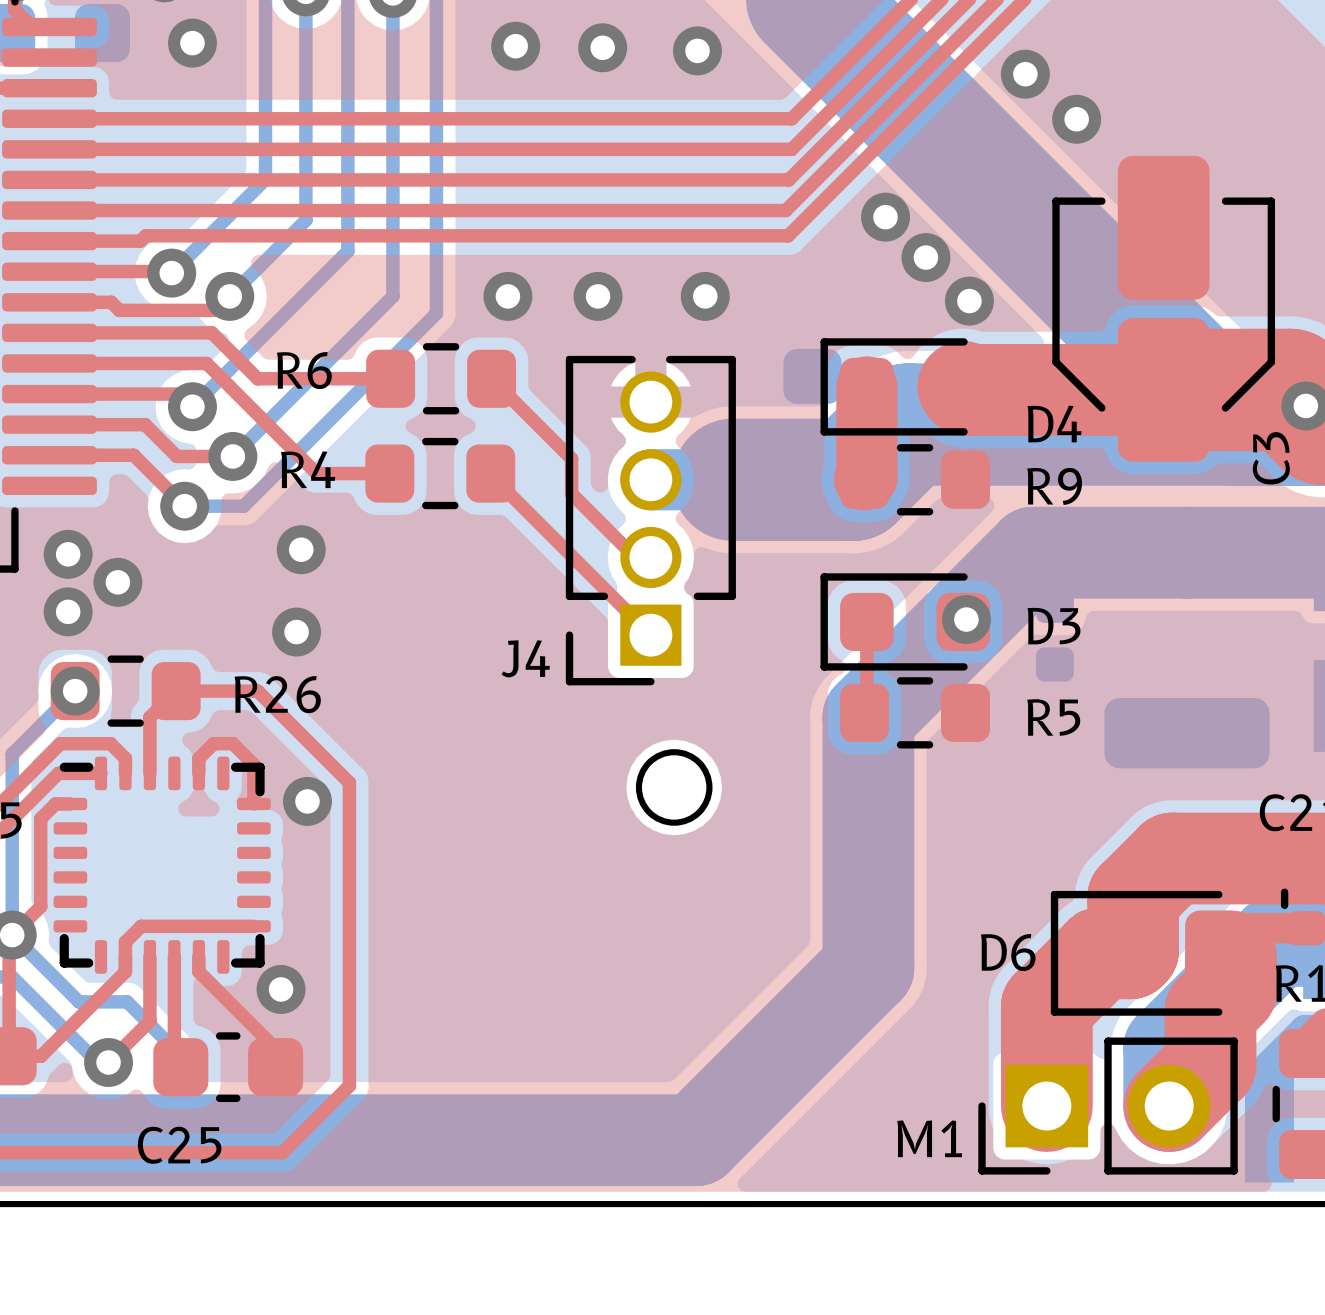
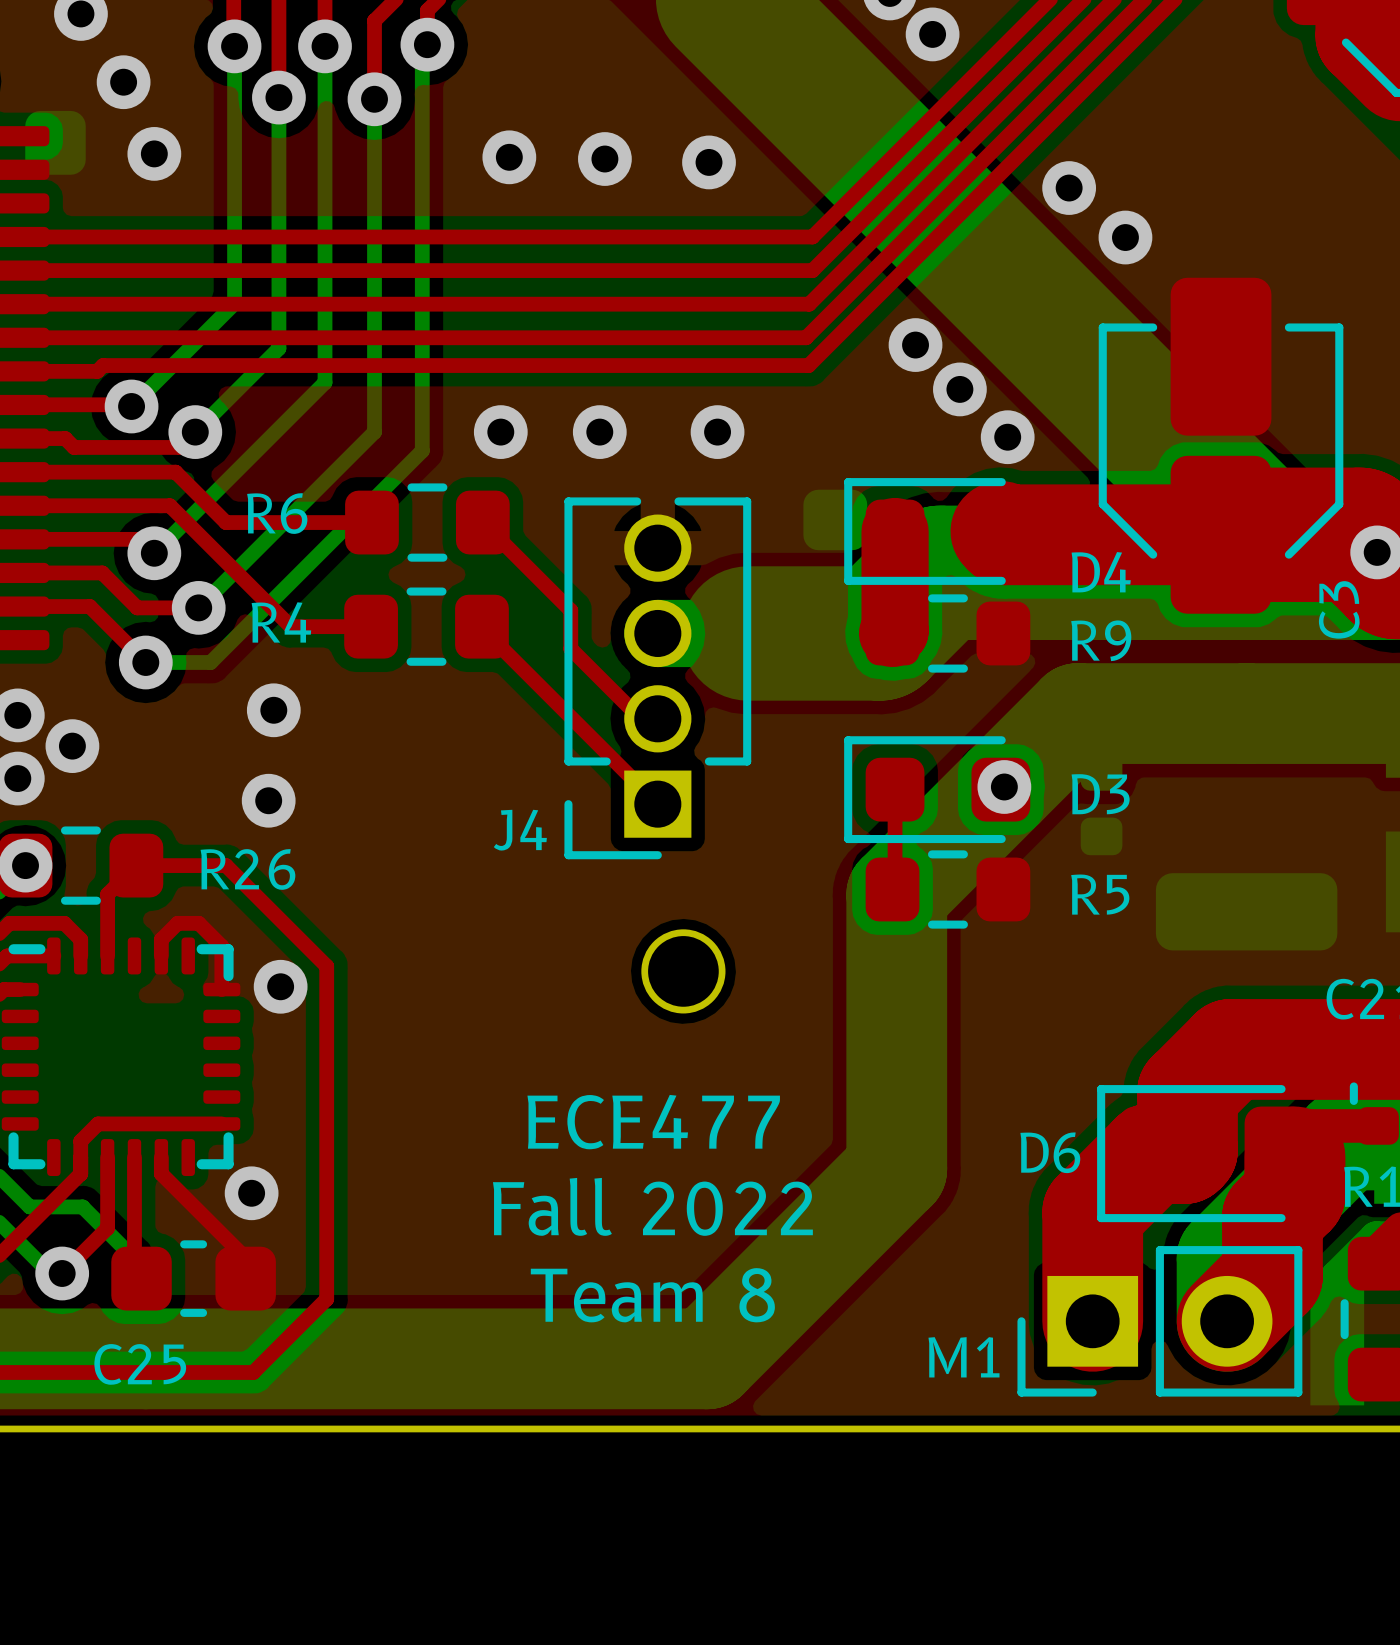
text: none -> ECE477 (653, 1122)
text: none -> Fall 2022 (652, 1206)
text: none -> Team 8 (652, 1295)

